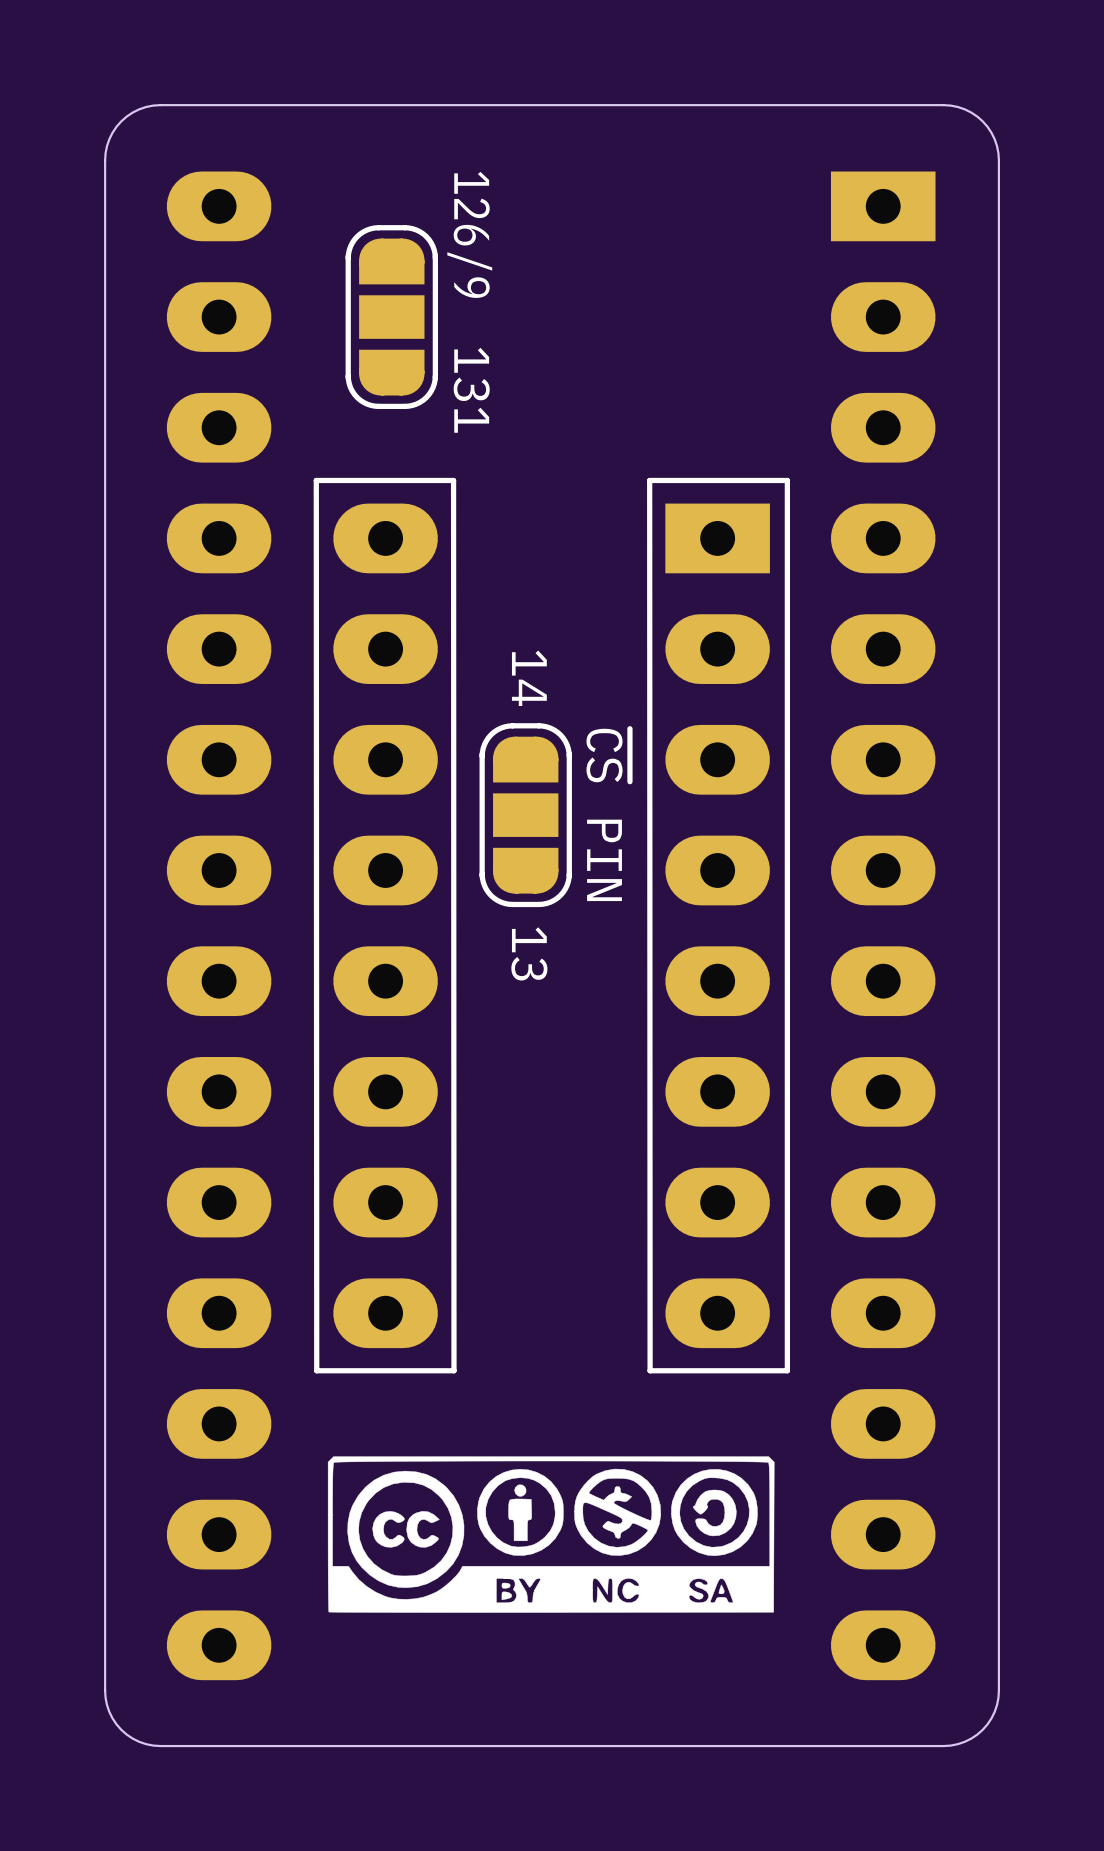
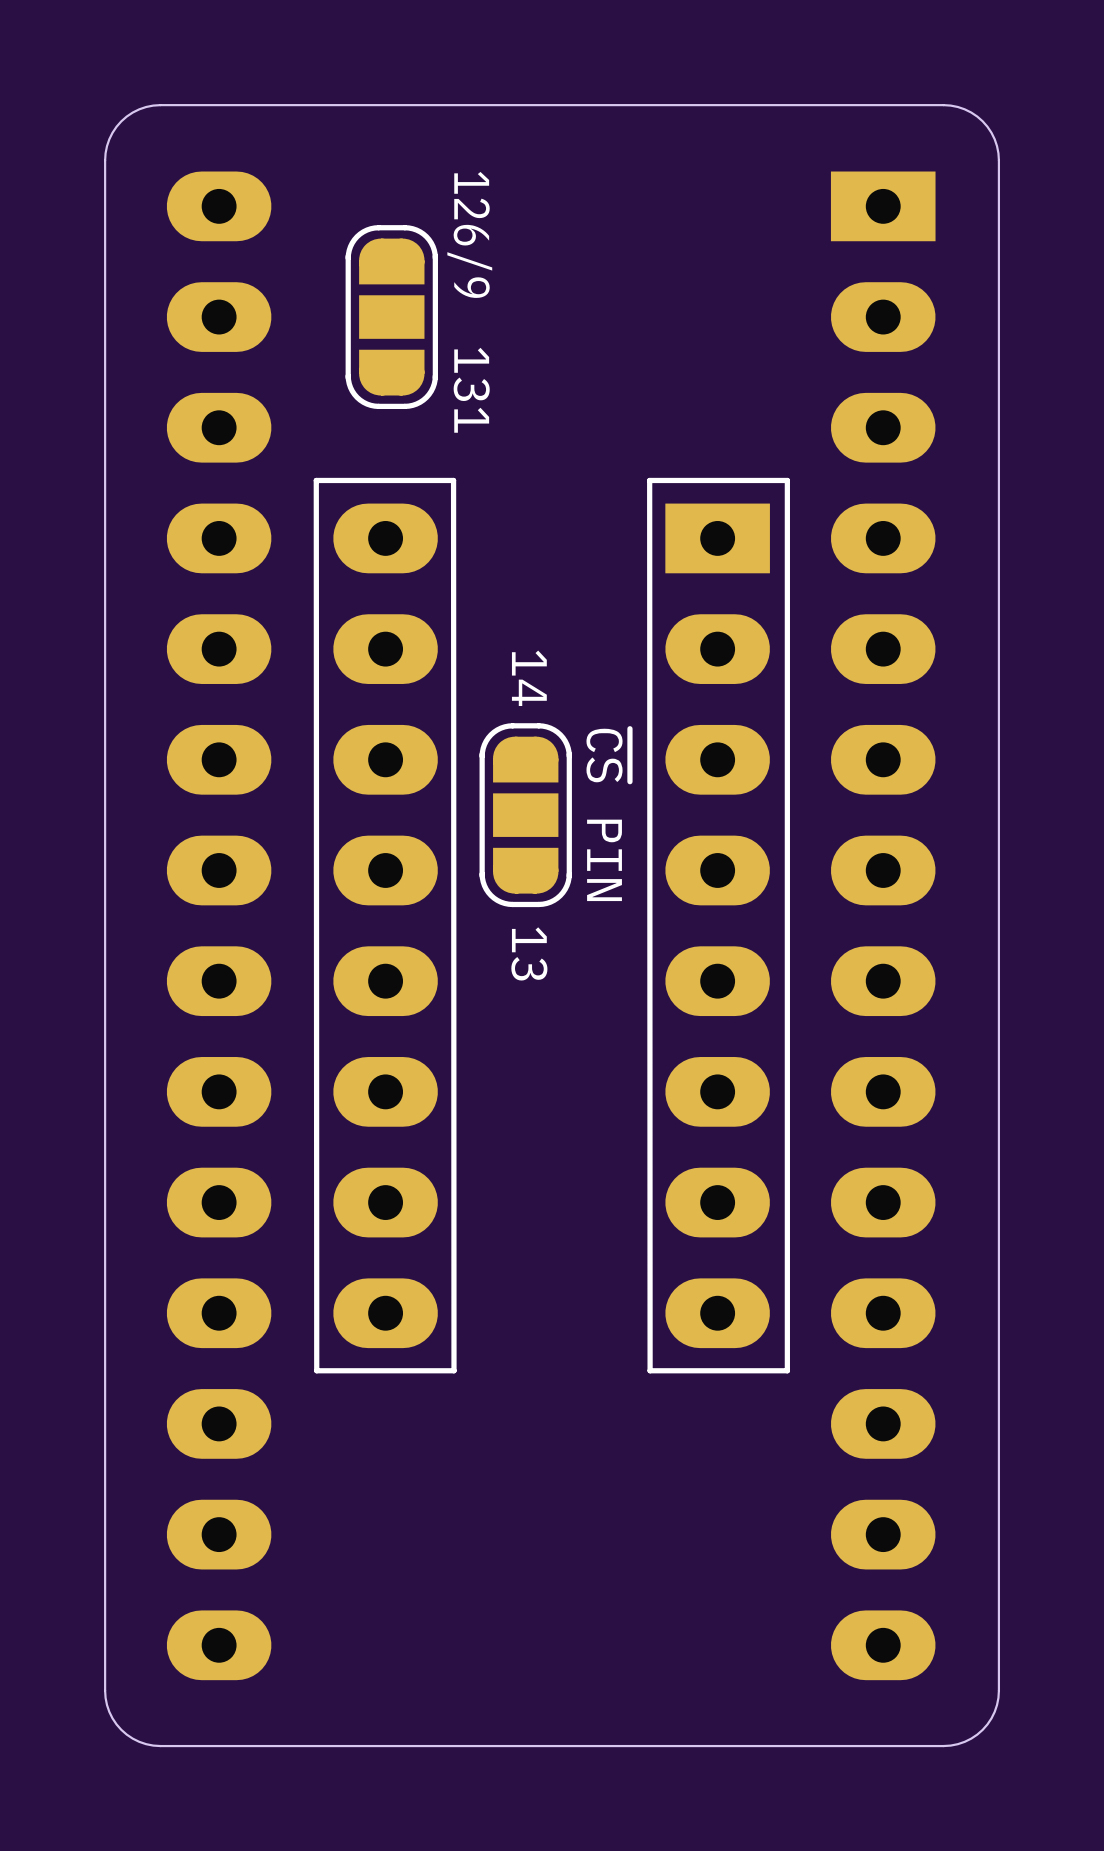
drawing: [327, 1456, 775, 1613] -> none

